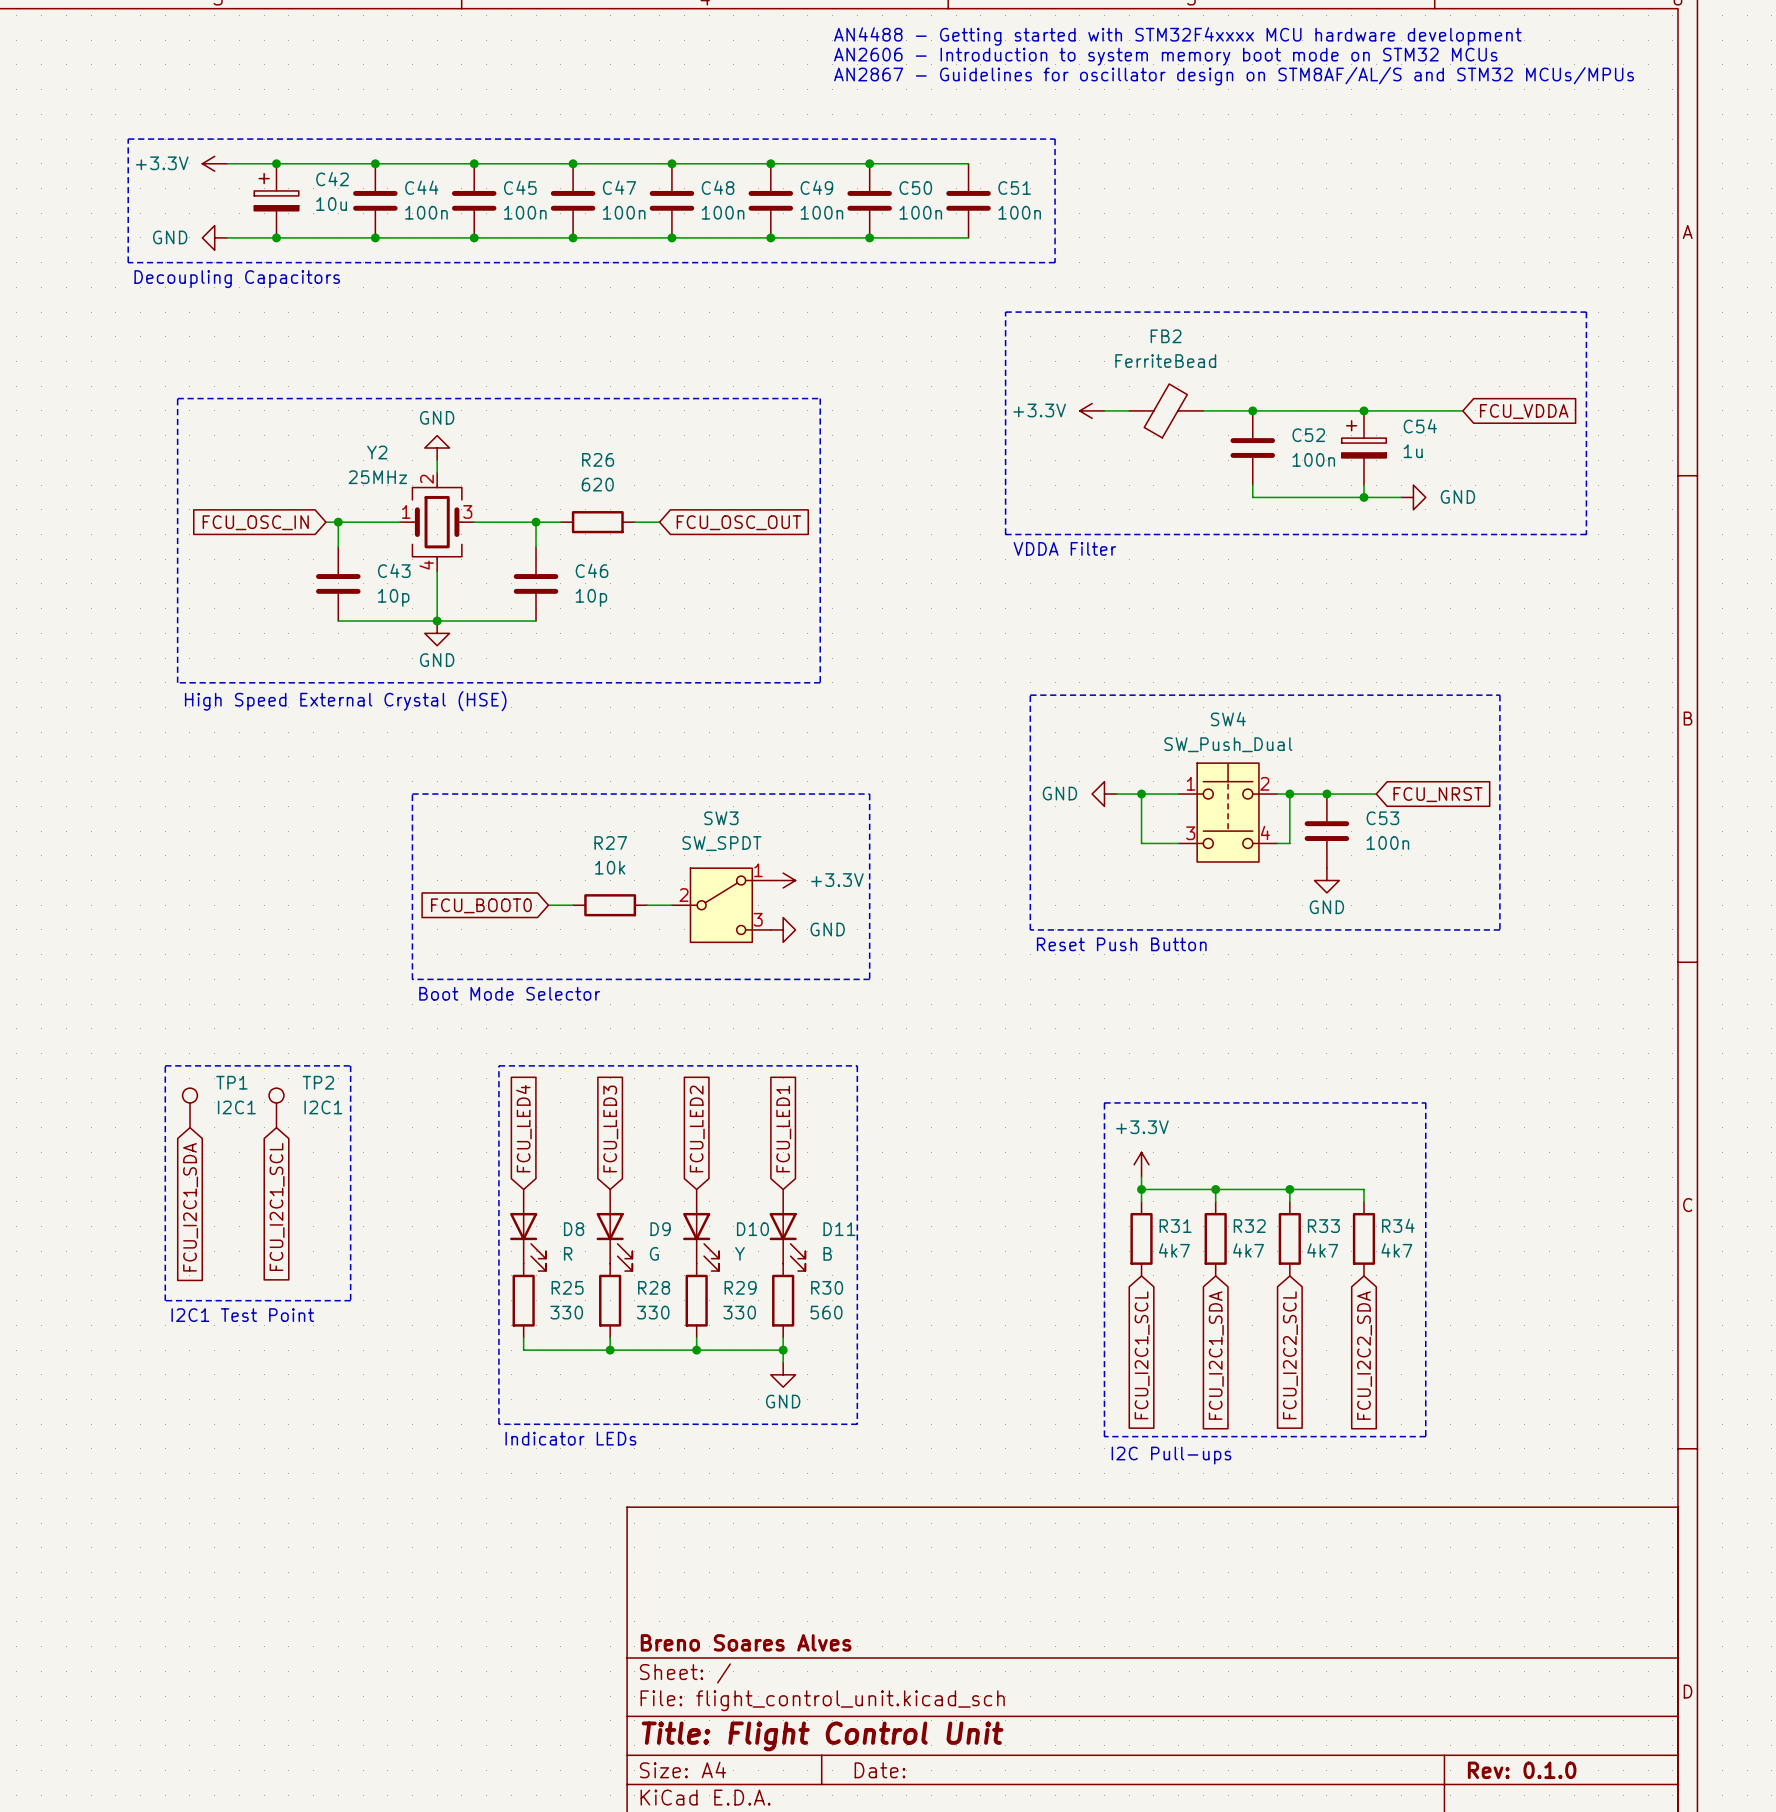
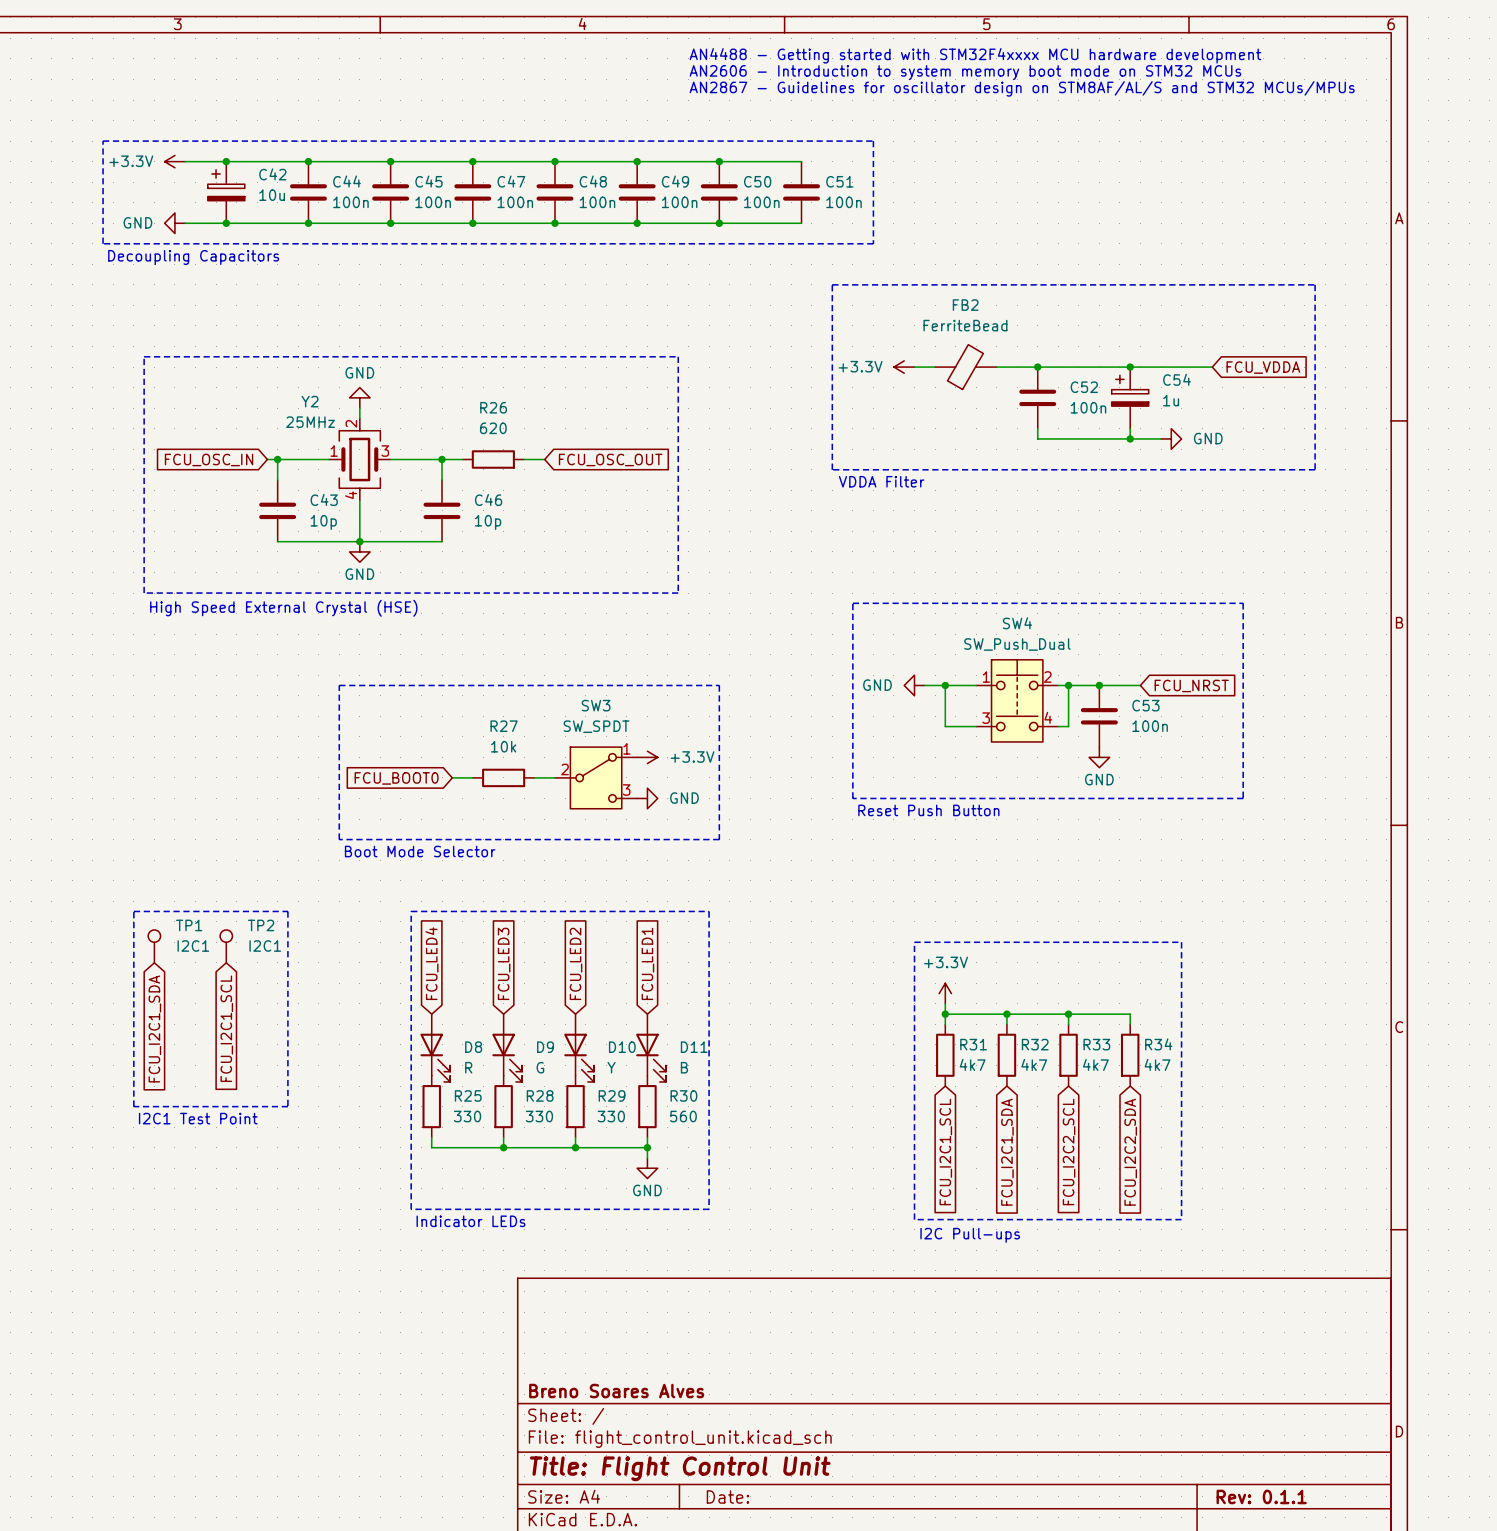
title block: Rev: 0.1.0 (1522, 1770) -> Rev: 0.1.1 (1261, 1496)

